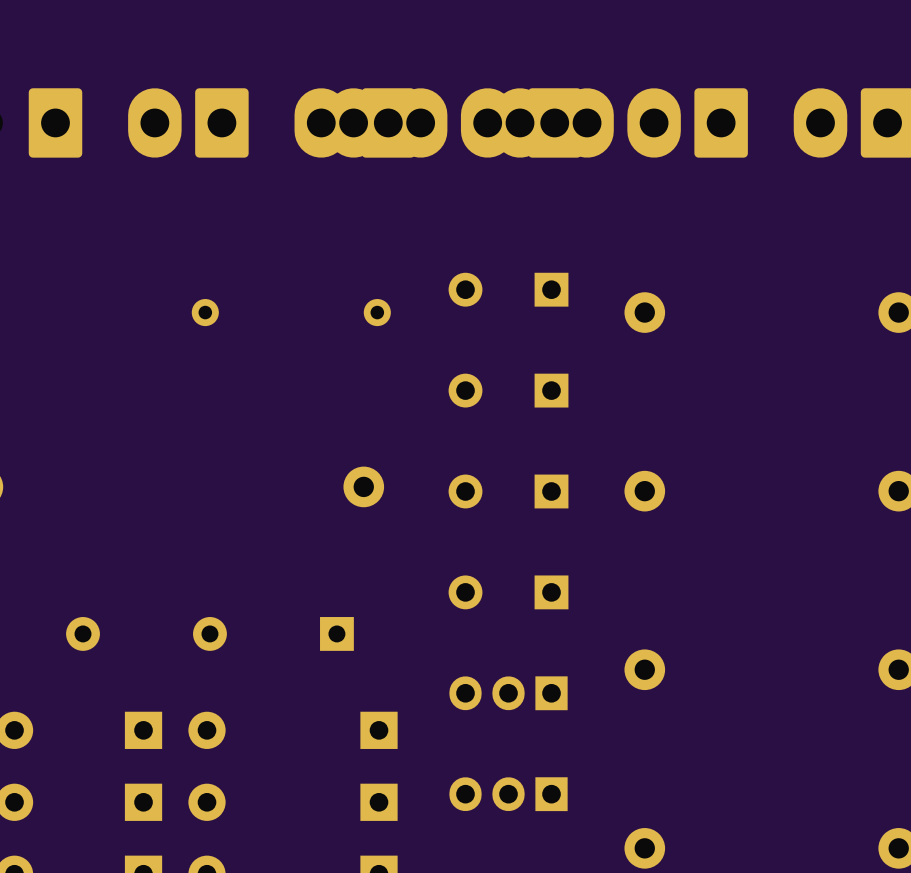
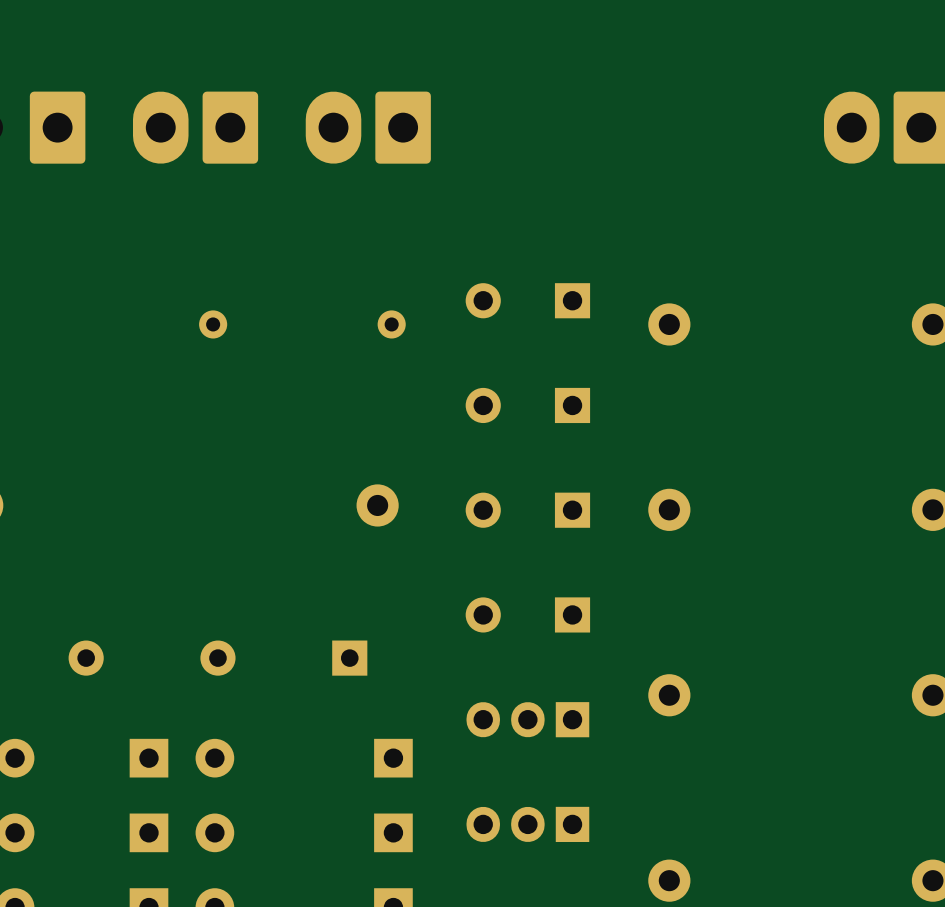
part: (454, 122) -> none
part: (620, 122) -> none

